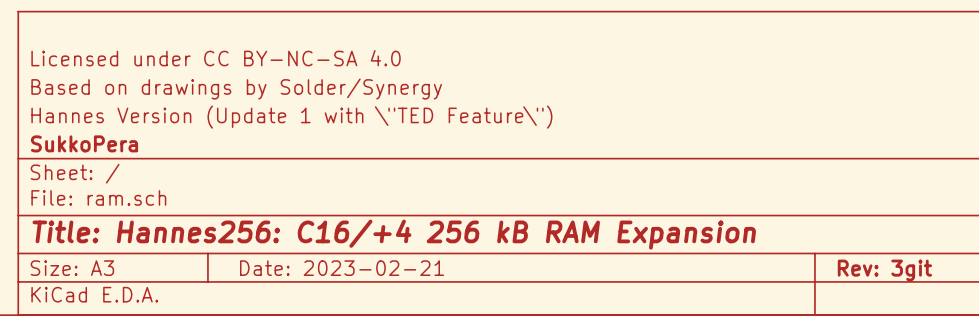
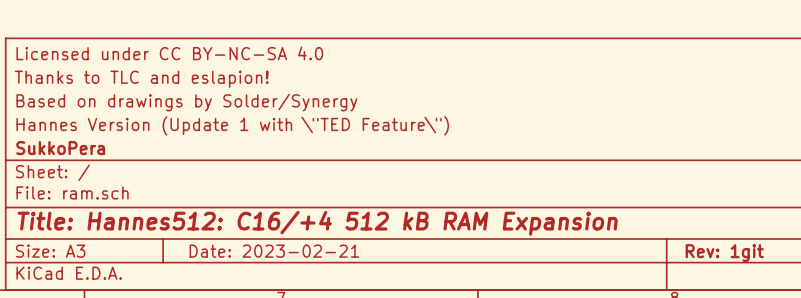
title block: none -> Licensed under CC BY-NC-SA 4.0 (169, 53)
title block: Licensed under CC BY-NC-SA 4.0 (216, 58) -> Thanks to TLC and eslapion! (141, 79)
title block: Title: Hannes256: C16/+4 256 kB RAM Expansion (394, 234) -> Title: Hannes512: C16/+4 512 kB RAM Expansion (317, 223)
title block: Rev: 3git (884, 270) -> Rev: 1git (724, 253)

